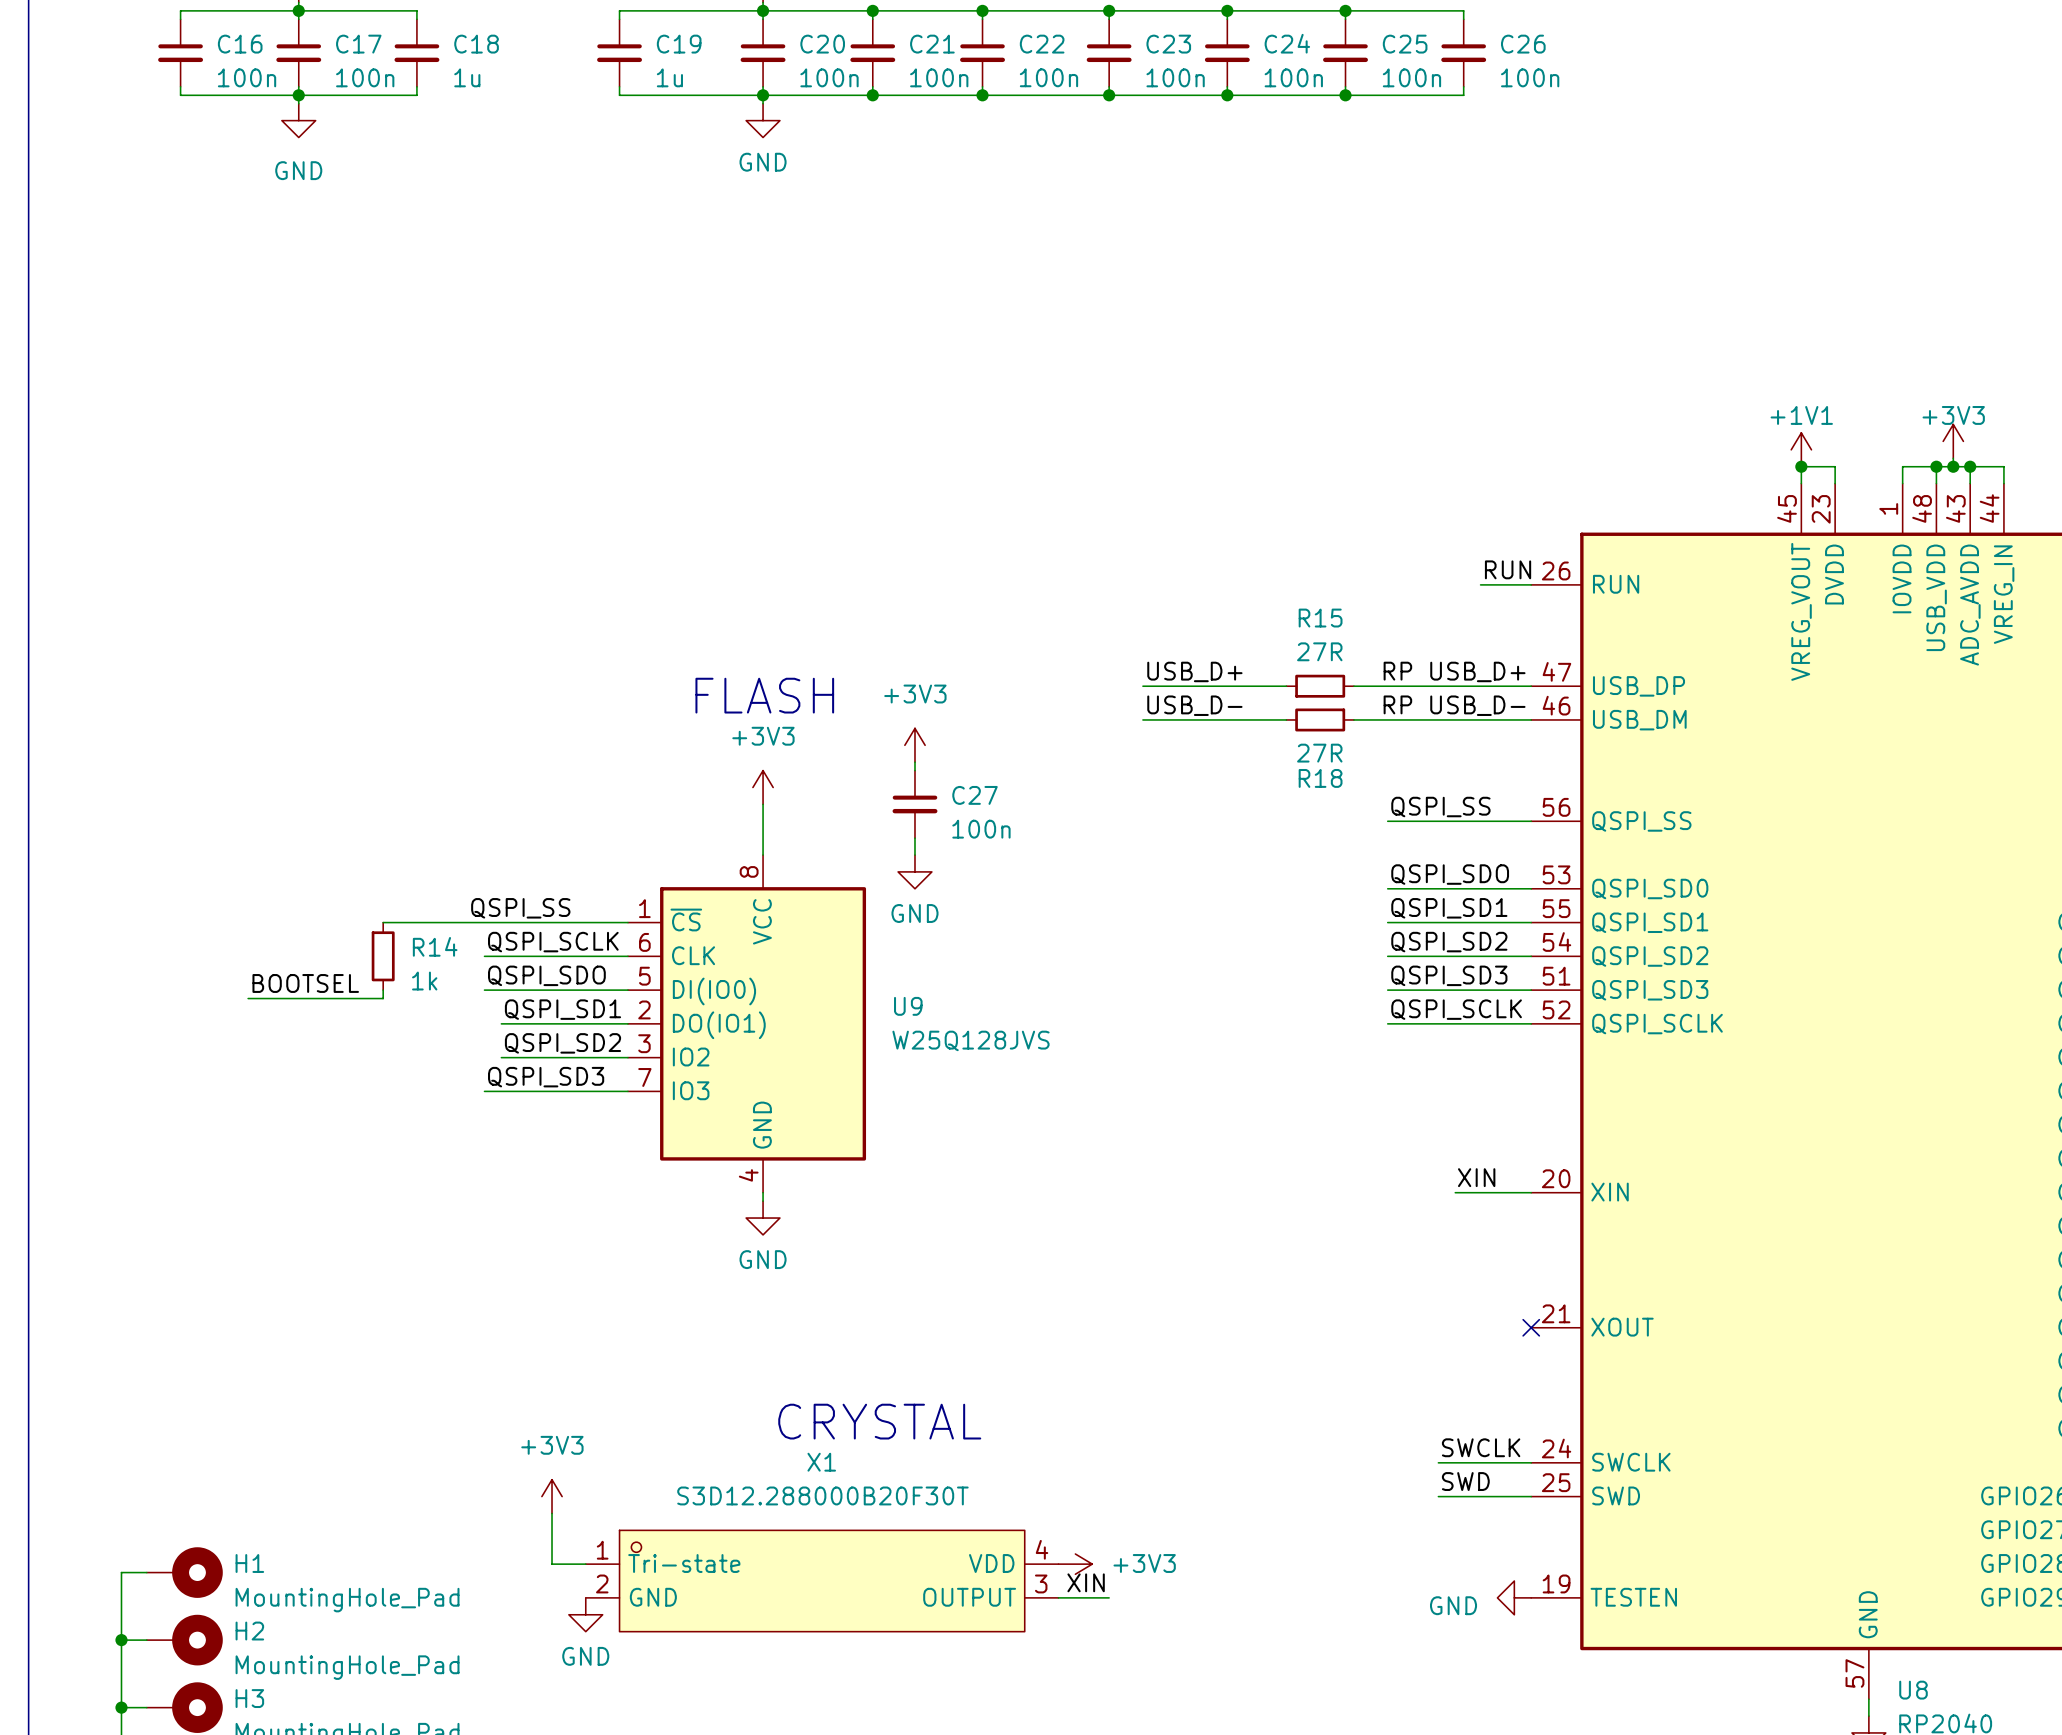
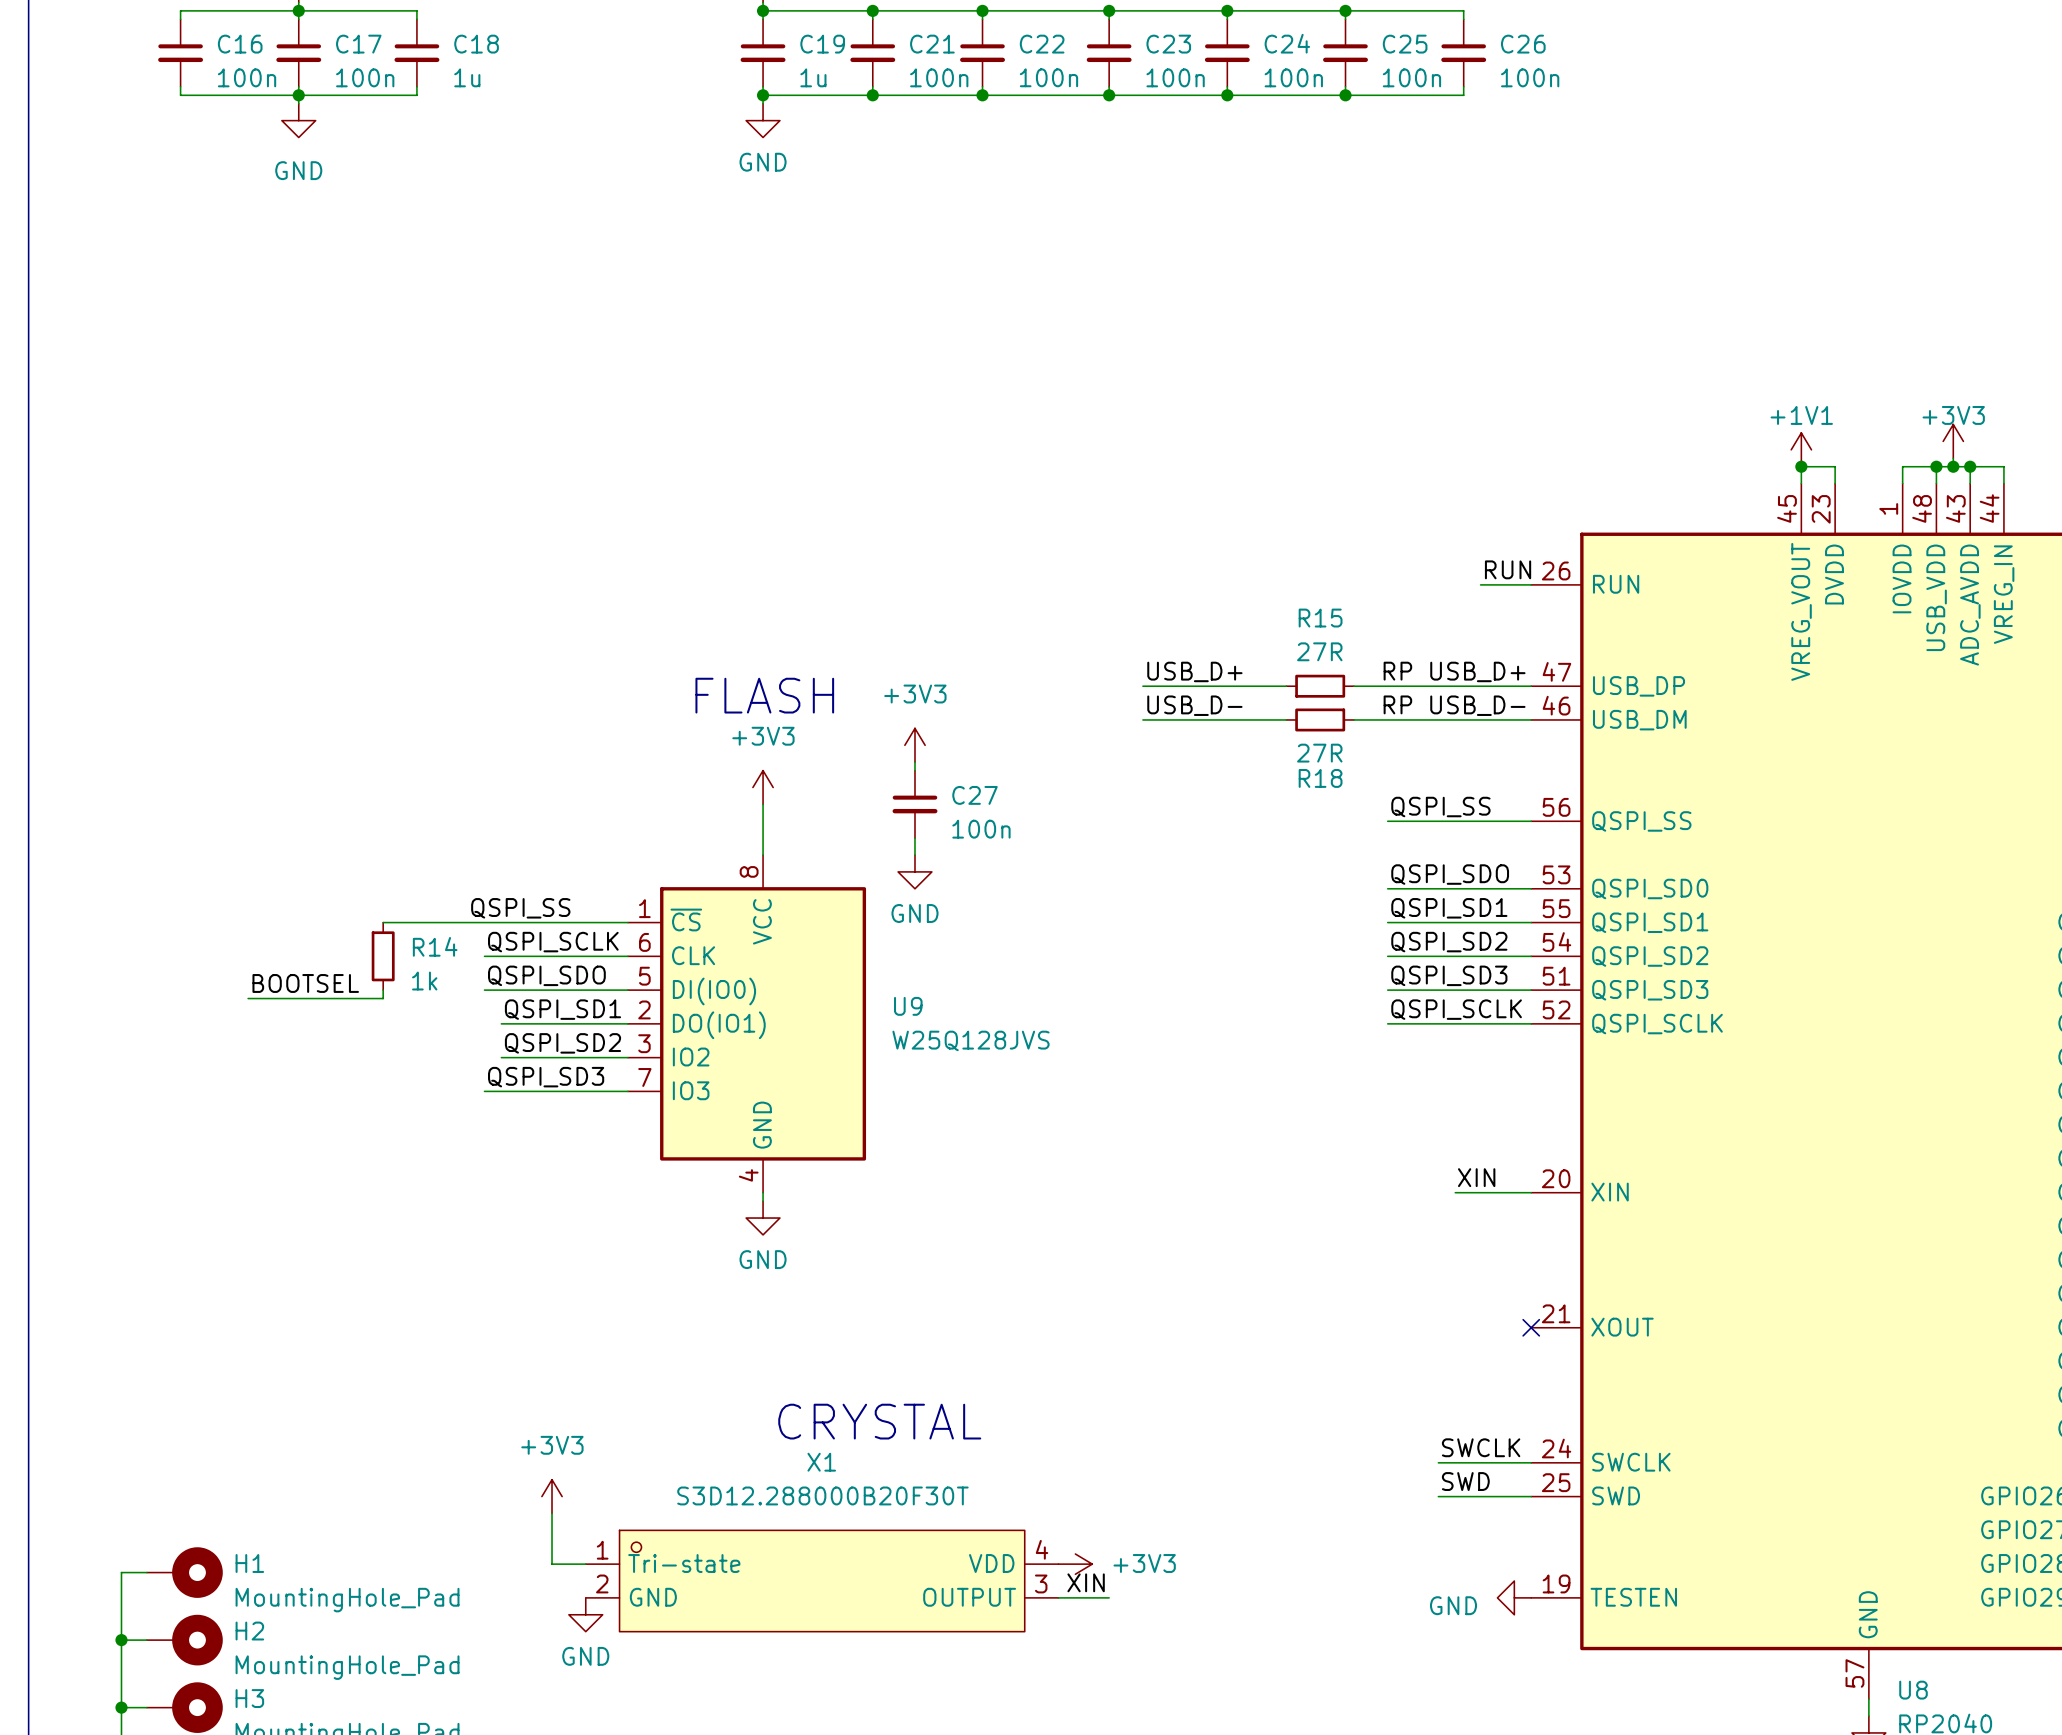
wire: (763, 10) (619, 10) (619, 19) -> none
C20 name: C20 (822, 44) -> C19 (822, 44)
C19: 1u (619, 53) -> none
C20 value: 100n (829, 77) -> 1u (813, 77)
wire: (619, 86) (619, 95) (763, 95) -> none

